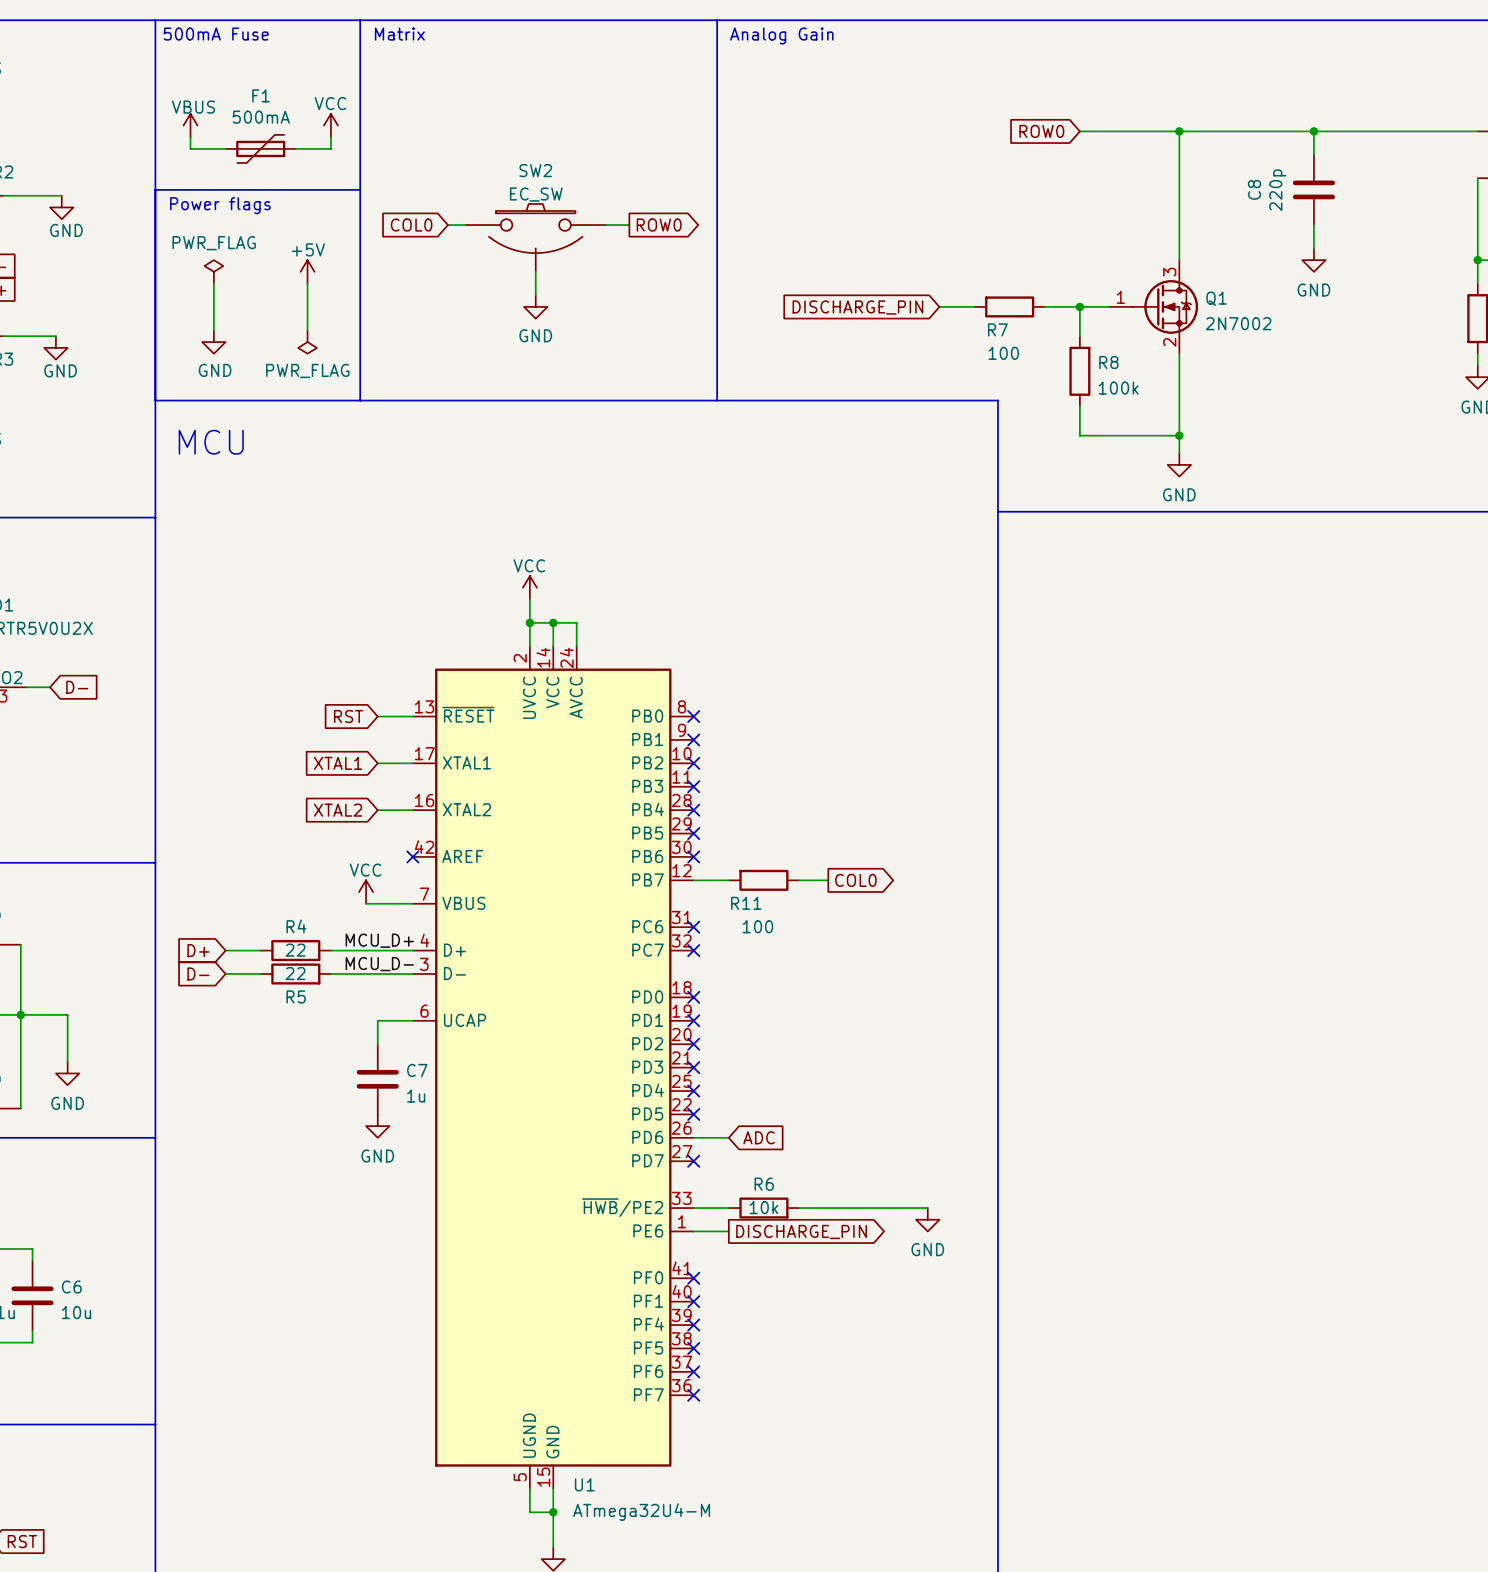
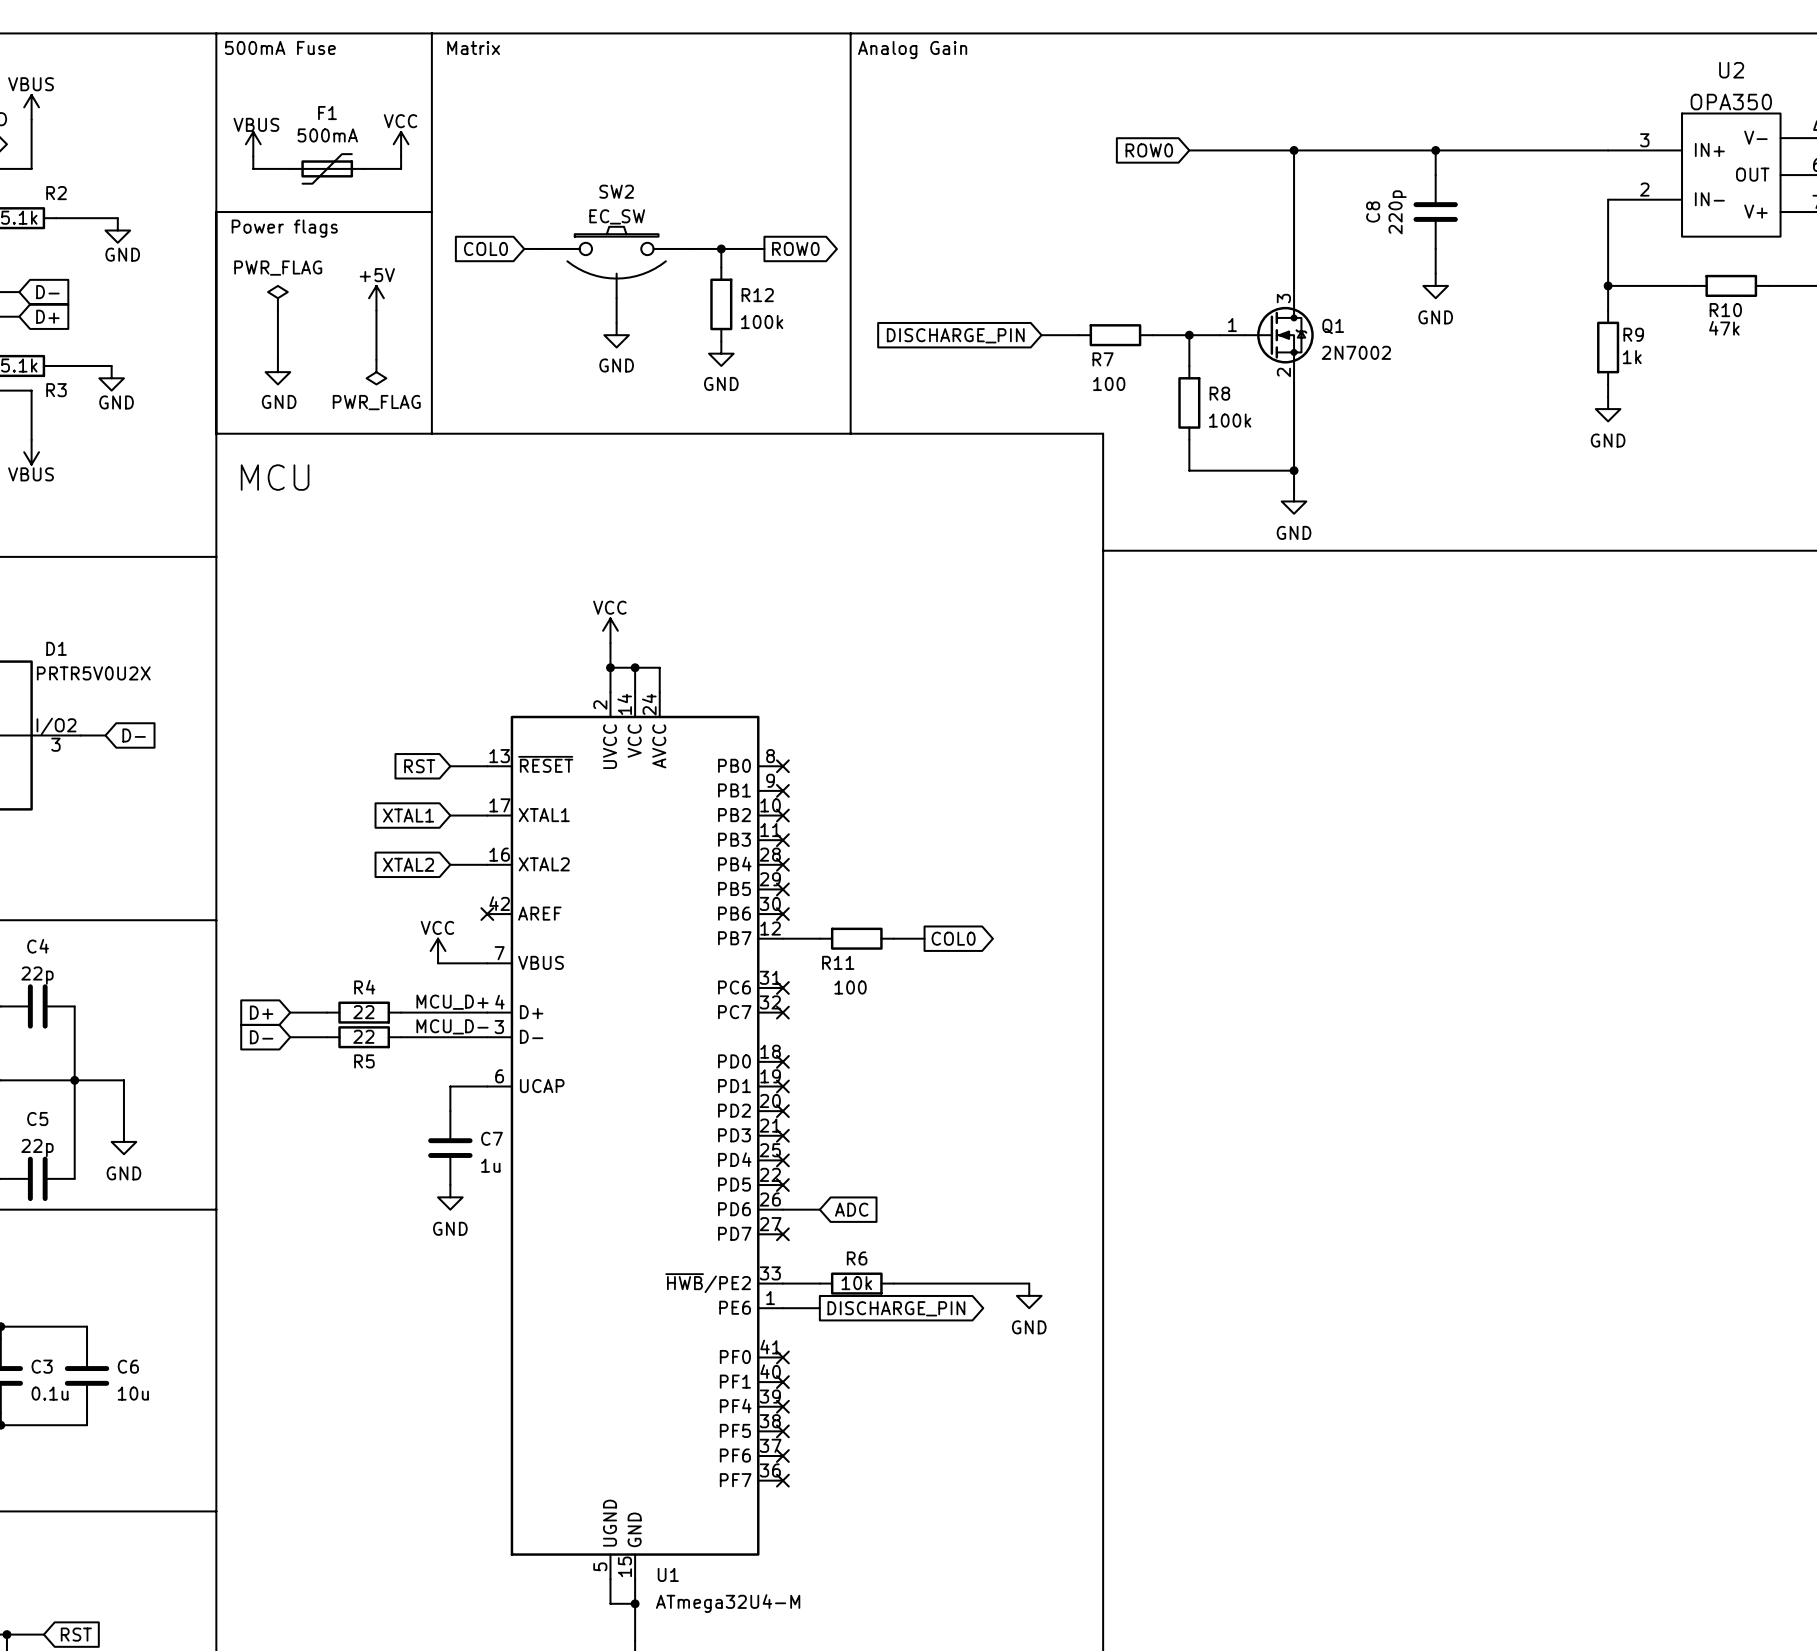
line: (717, 20) (717, 400) -> (850, 33) (850, 433)
text position: Analog Gain (781, 36) -> Analog Gain (912, 50)
wire: none -> (715, 248) (764, 248)
wire: none -> (721, 248) (721, 267)
junction: none -> (721, 248)
global label position: ROW0 (659, 225) -> ROW0 (795, 248)
R12: none -> 100k (721, 304)
power symbol: none -> GND (721, 353)

